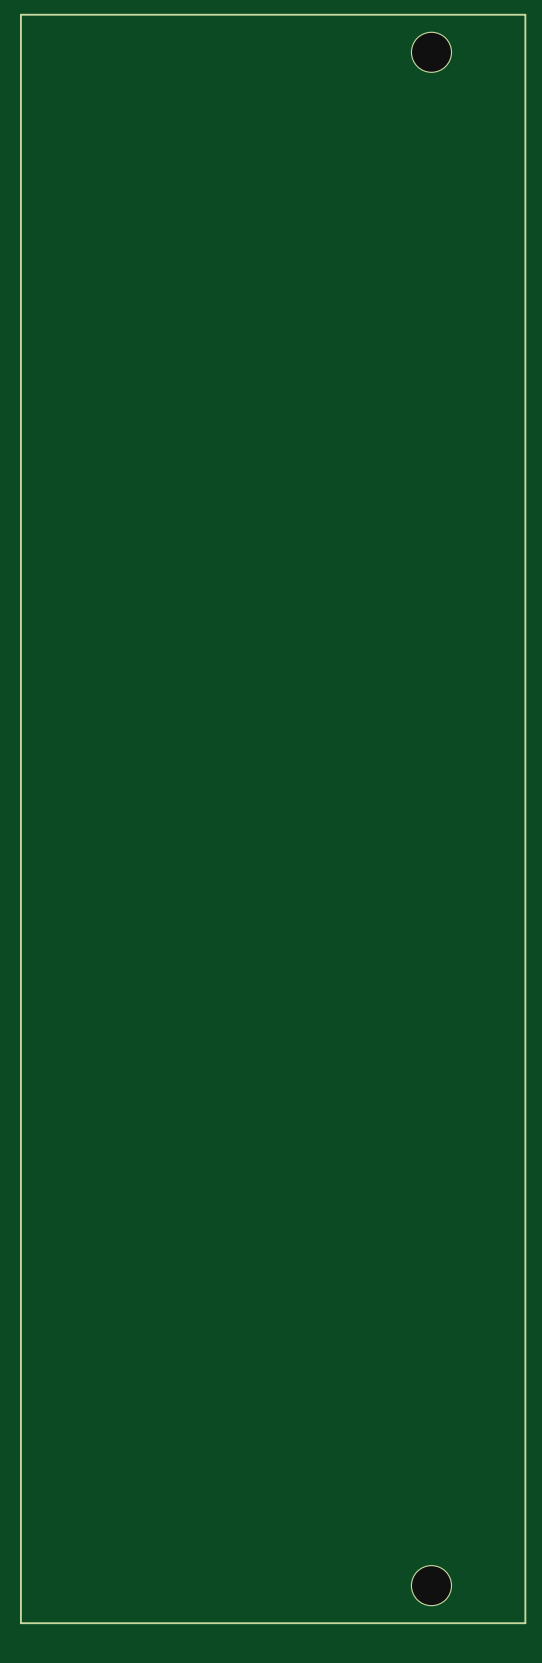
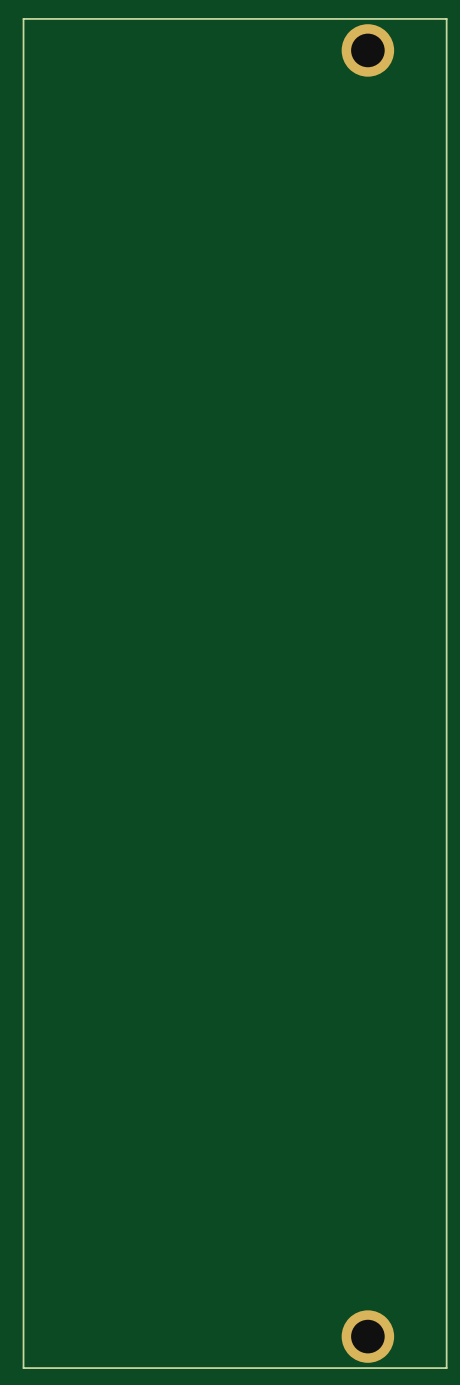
part footprint: [411, 32, 452, 73] -> [341, 24, 395, 77]
part footprint: [411, 1565, 452, 1606] -> [341, 1310, 395, 1363]

